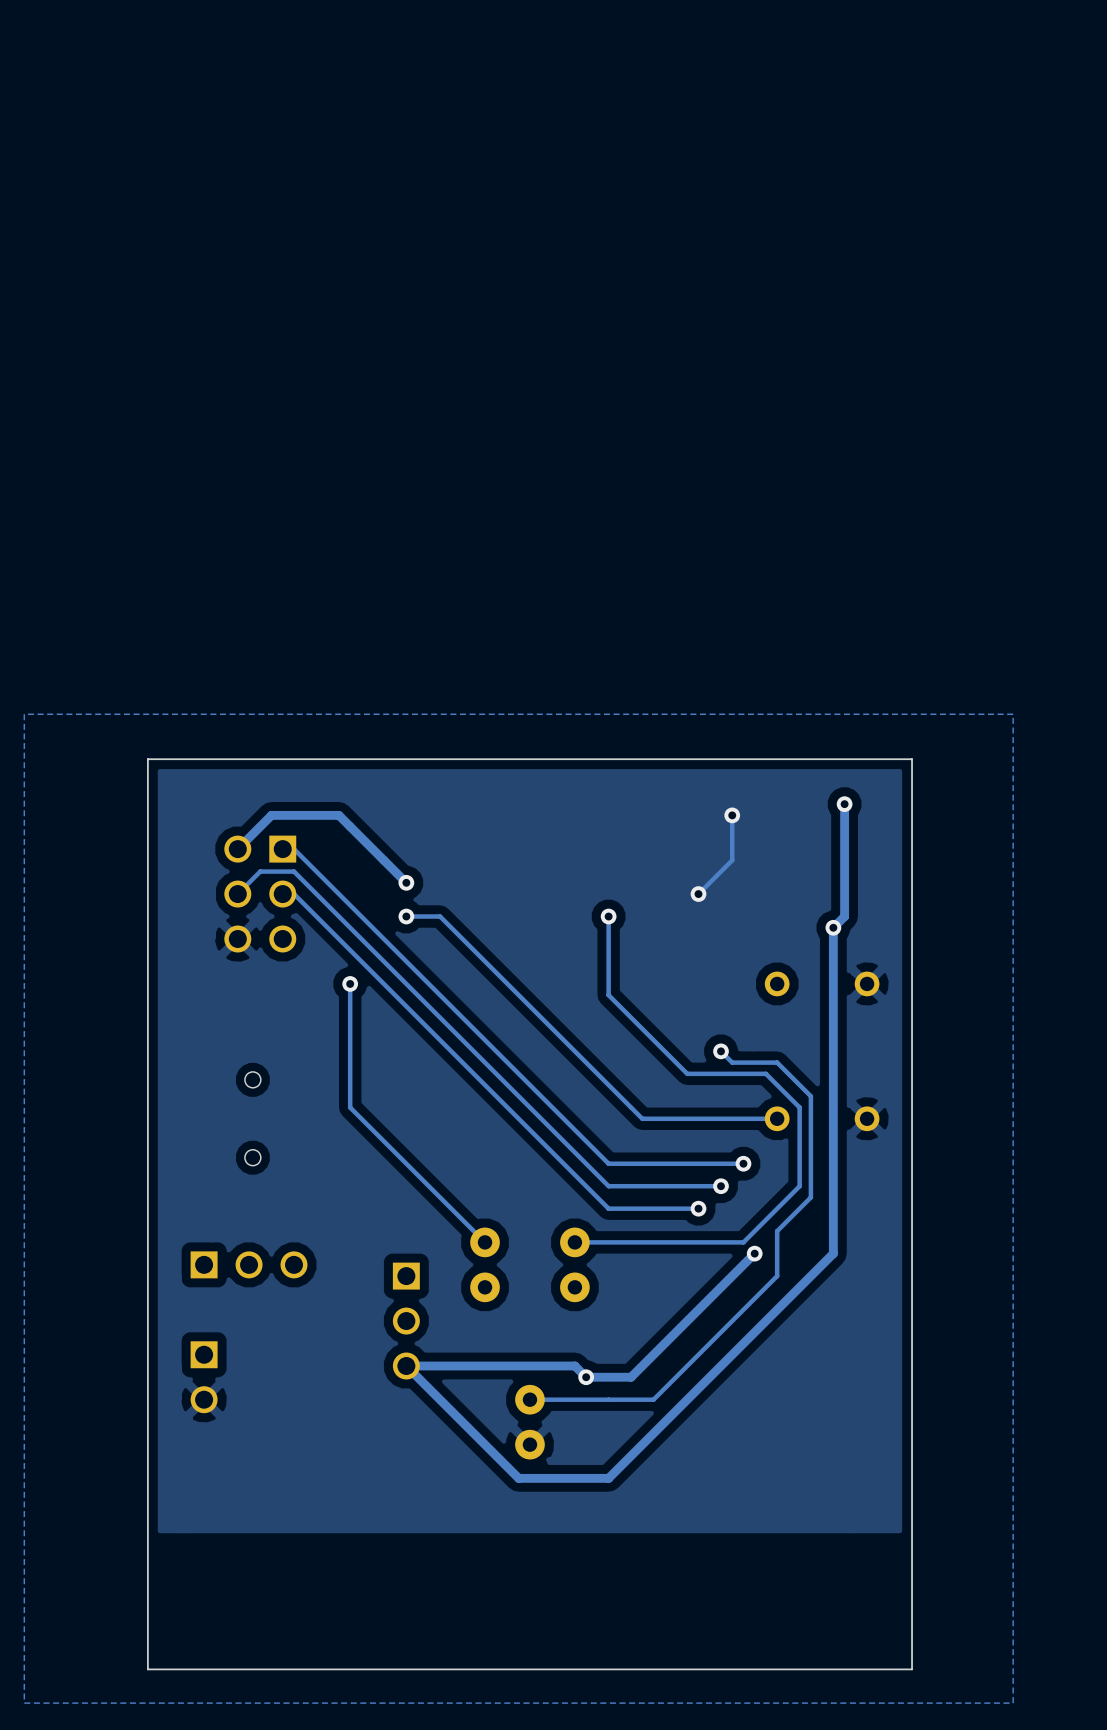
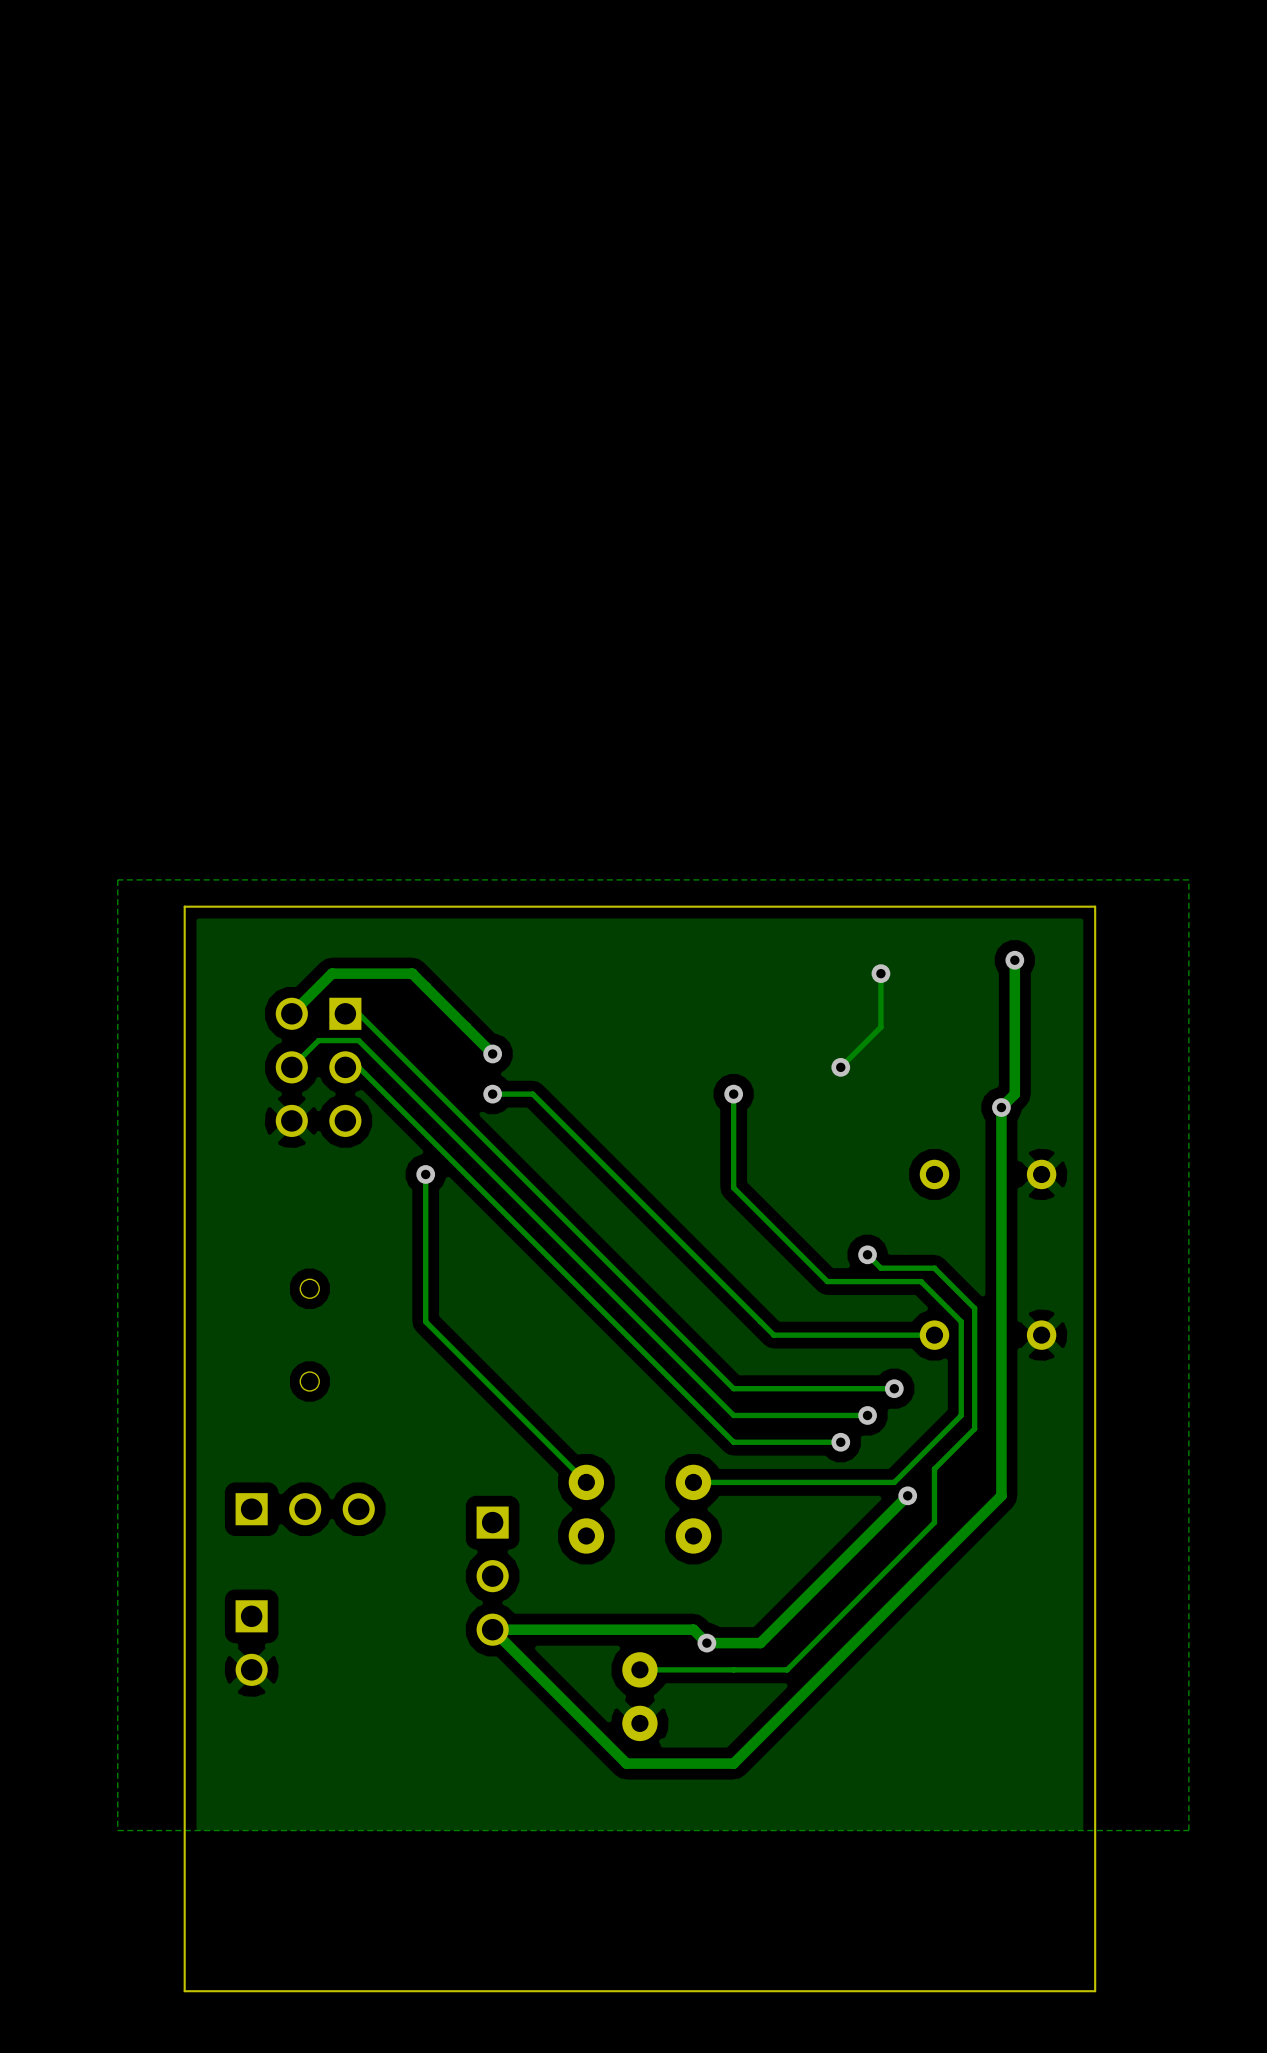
zone outline: (1013, 714) (1013, 1703) (24, 1703) (24, 714) (1013, 714) -> (1188, 879) (1188, 1830) (117, 1830) (117, 879) (1188, 879)

